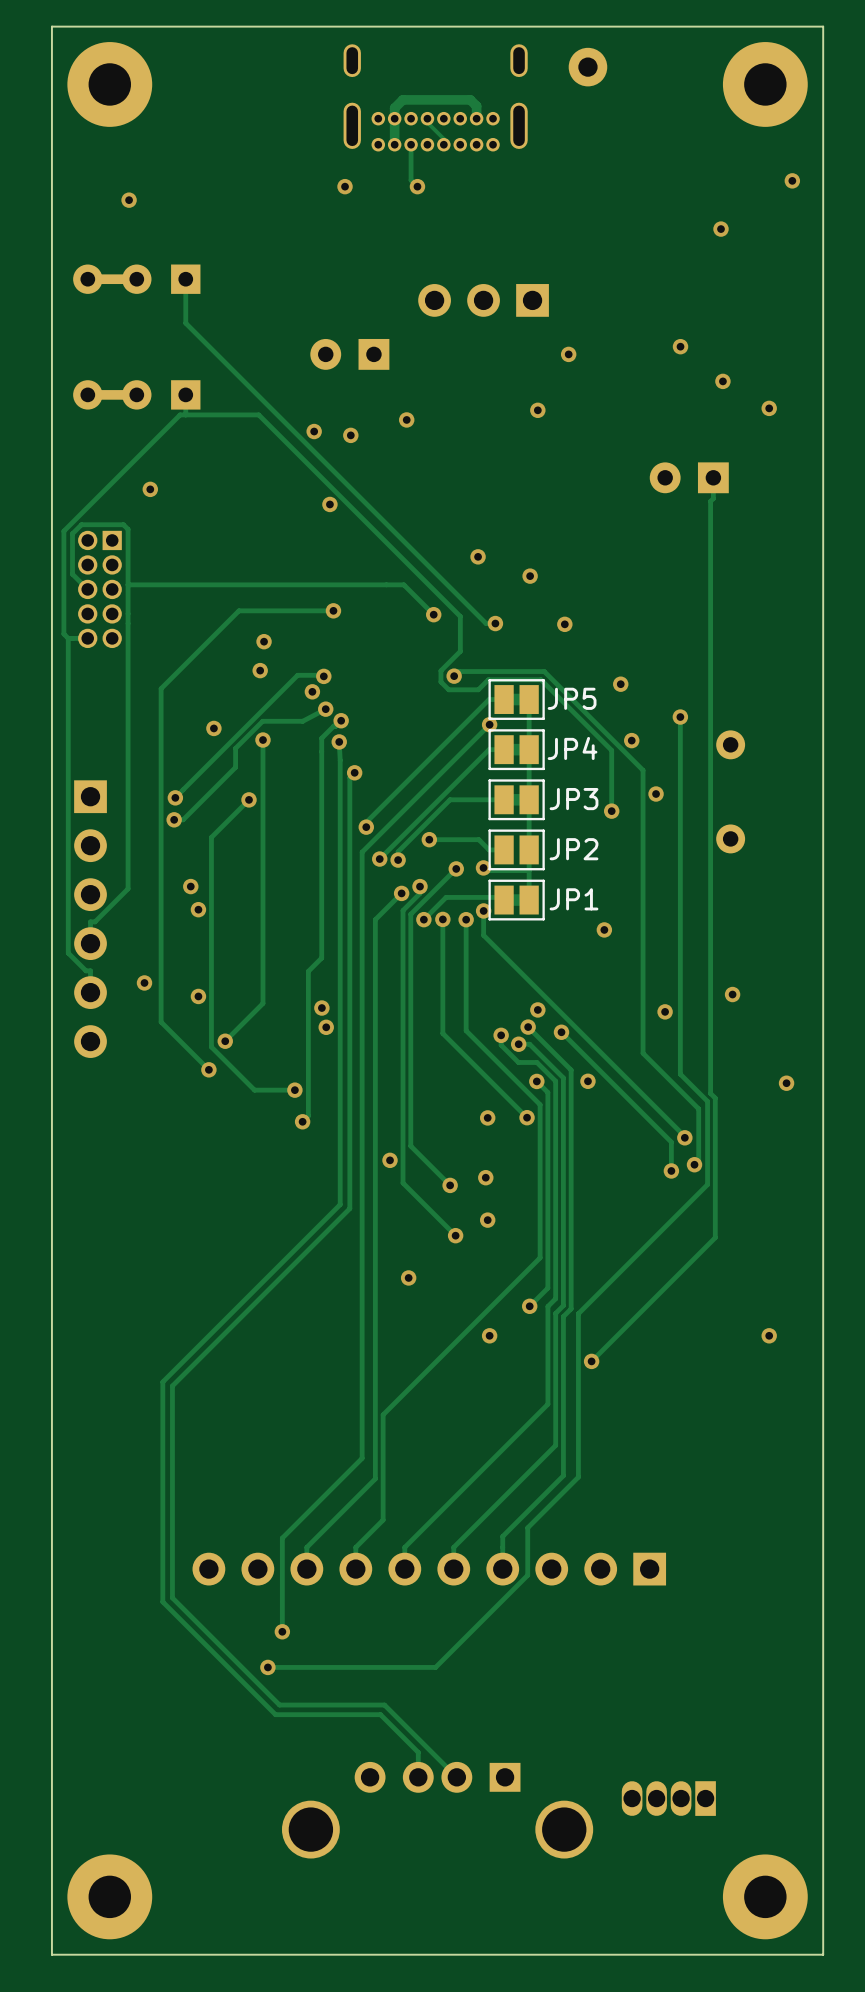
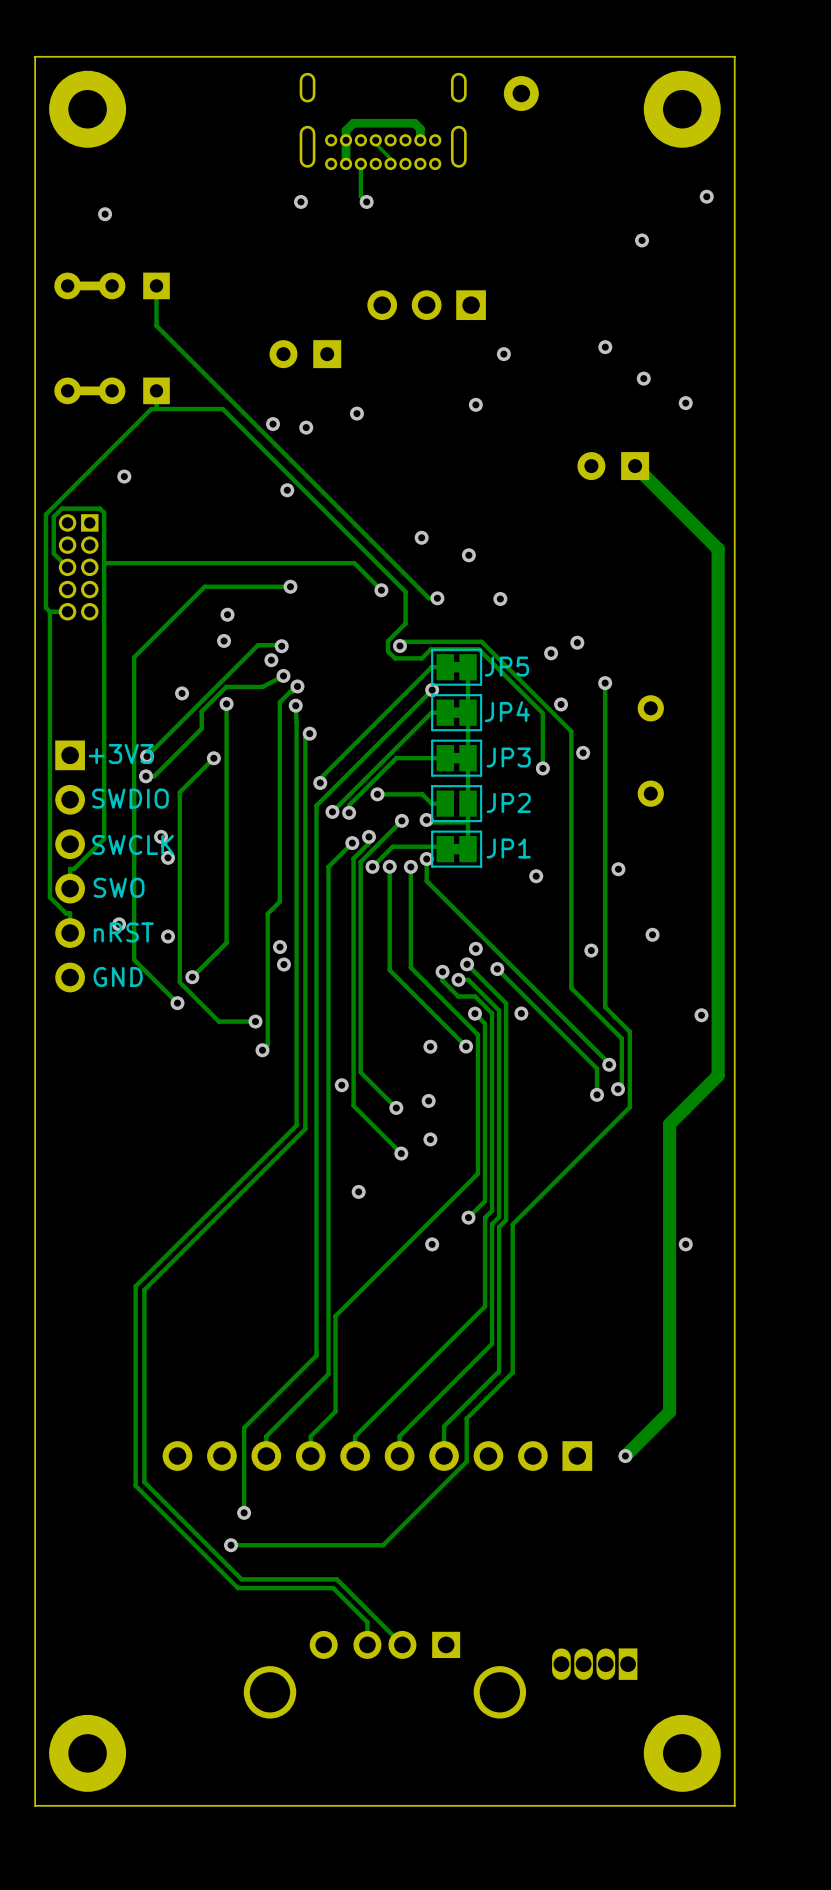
track: (713, 477) (713, 498) (710, 501) (710, 1093) (715, 1098) (715, 1237) (591, 1361) -> (635, 466) (718, 549) (718, 1075) (669, 1124) (669, 1411) (625, 1456)
via: none -> (577, 642)
text: none -> +3V3 (121, 754)
text: none -> SWDIO (130, 798)
text: none -> SWCLK (133, 844)
via: none -> (618, 869)
text: none -> SWO (119, 887)
text: none -> nRST (123, 932)
text: none -> GND (118, 977)
via: (591, 1361) -> none
via: none -> (625, 1456)

